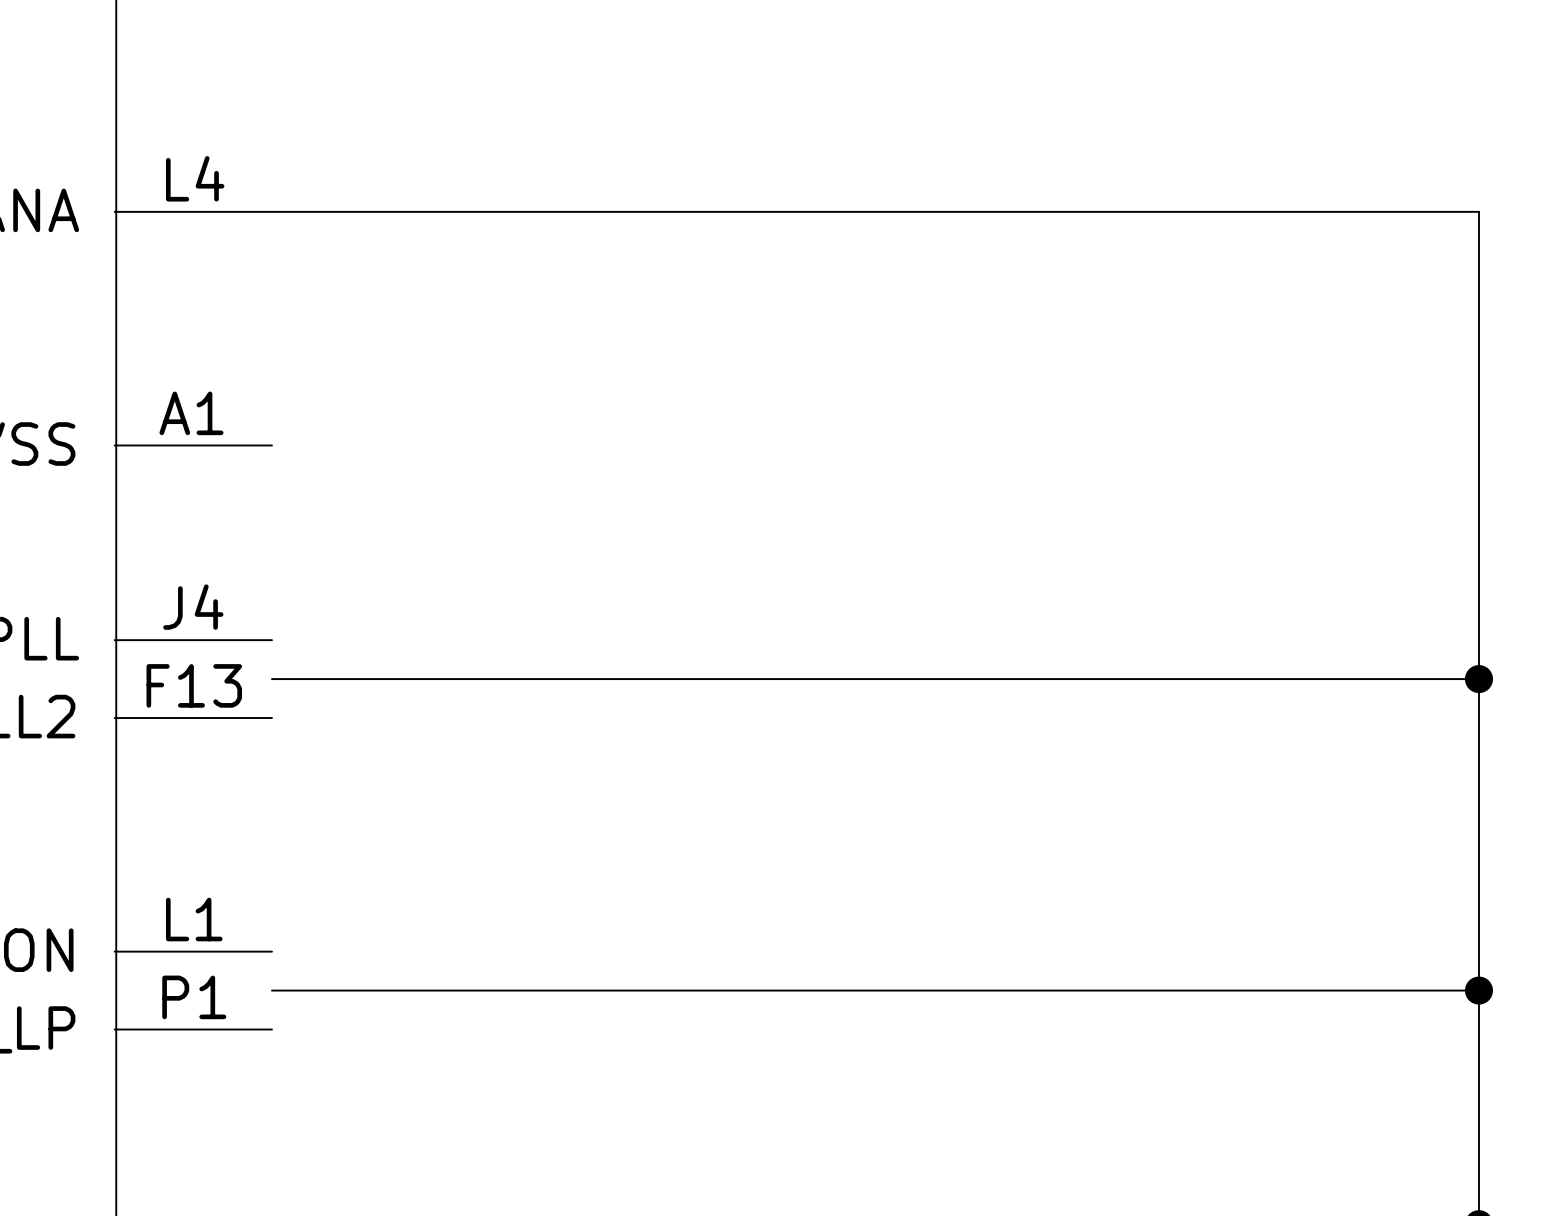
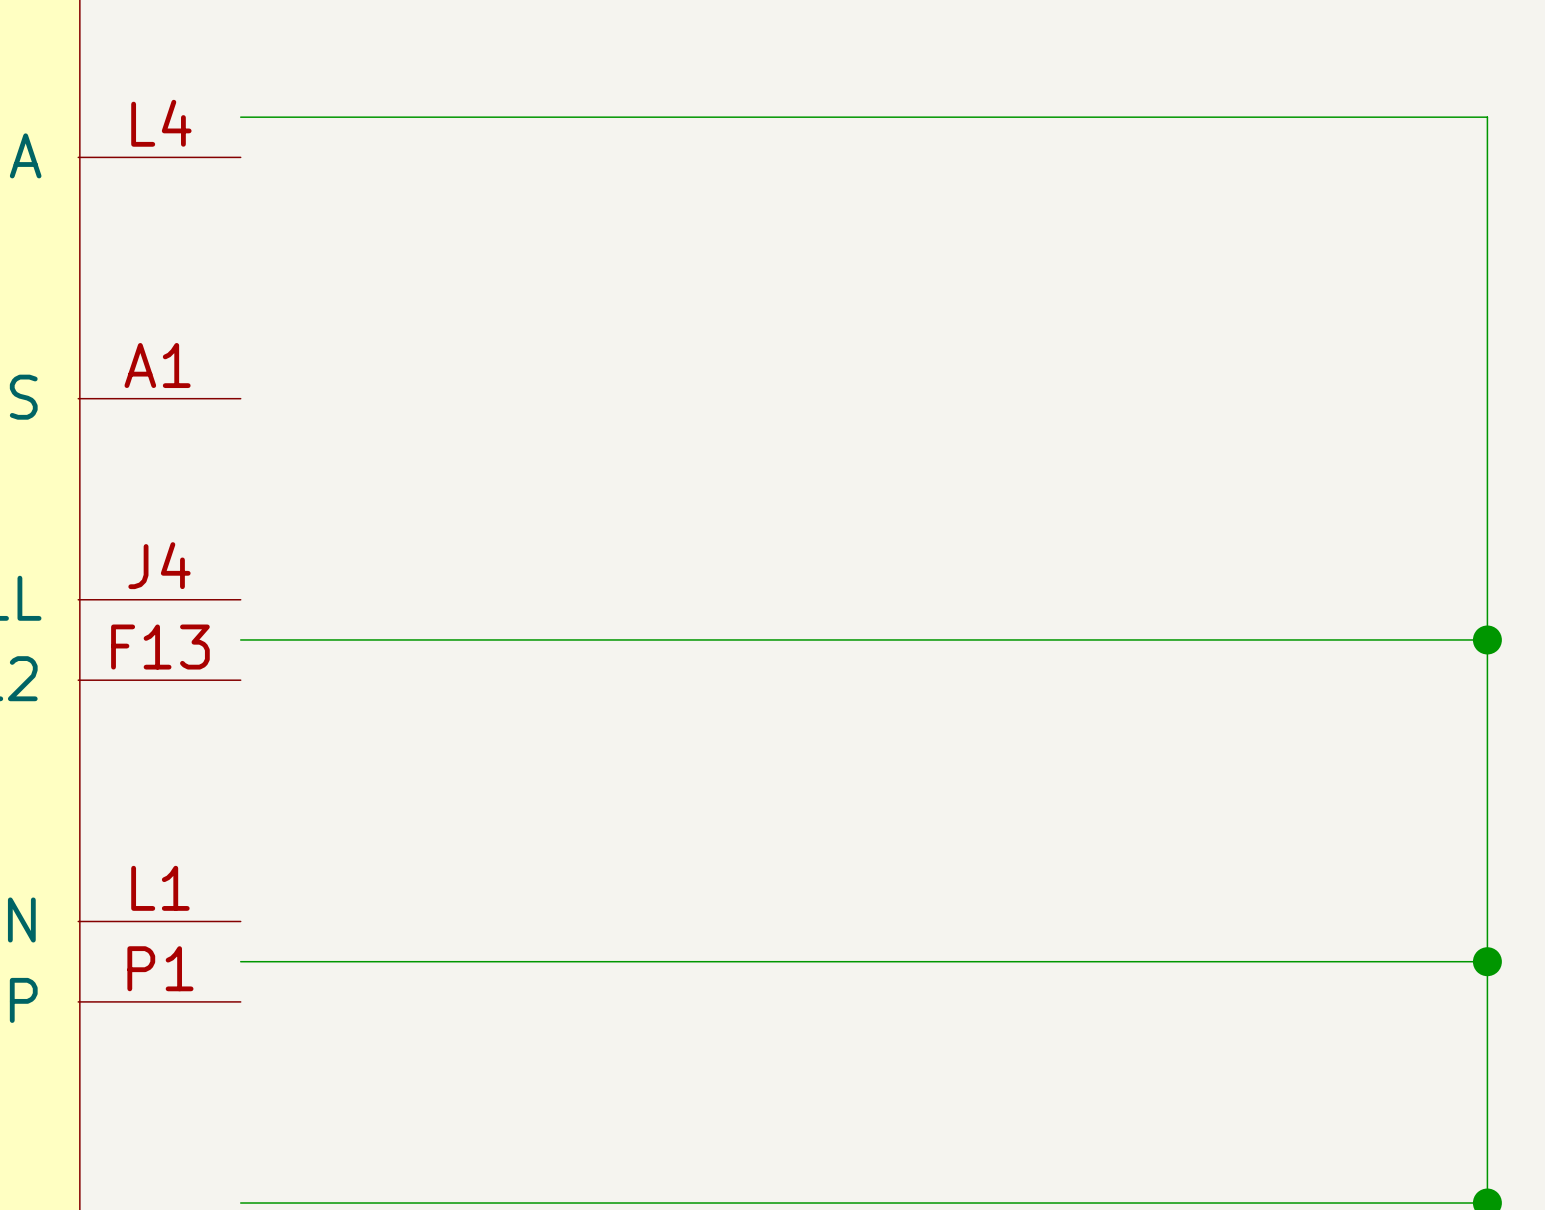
wire: (271, 211) (1478, 211) -> (240, 117) (1487, 117) (1487, 157)

